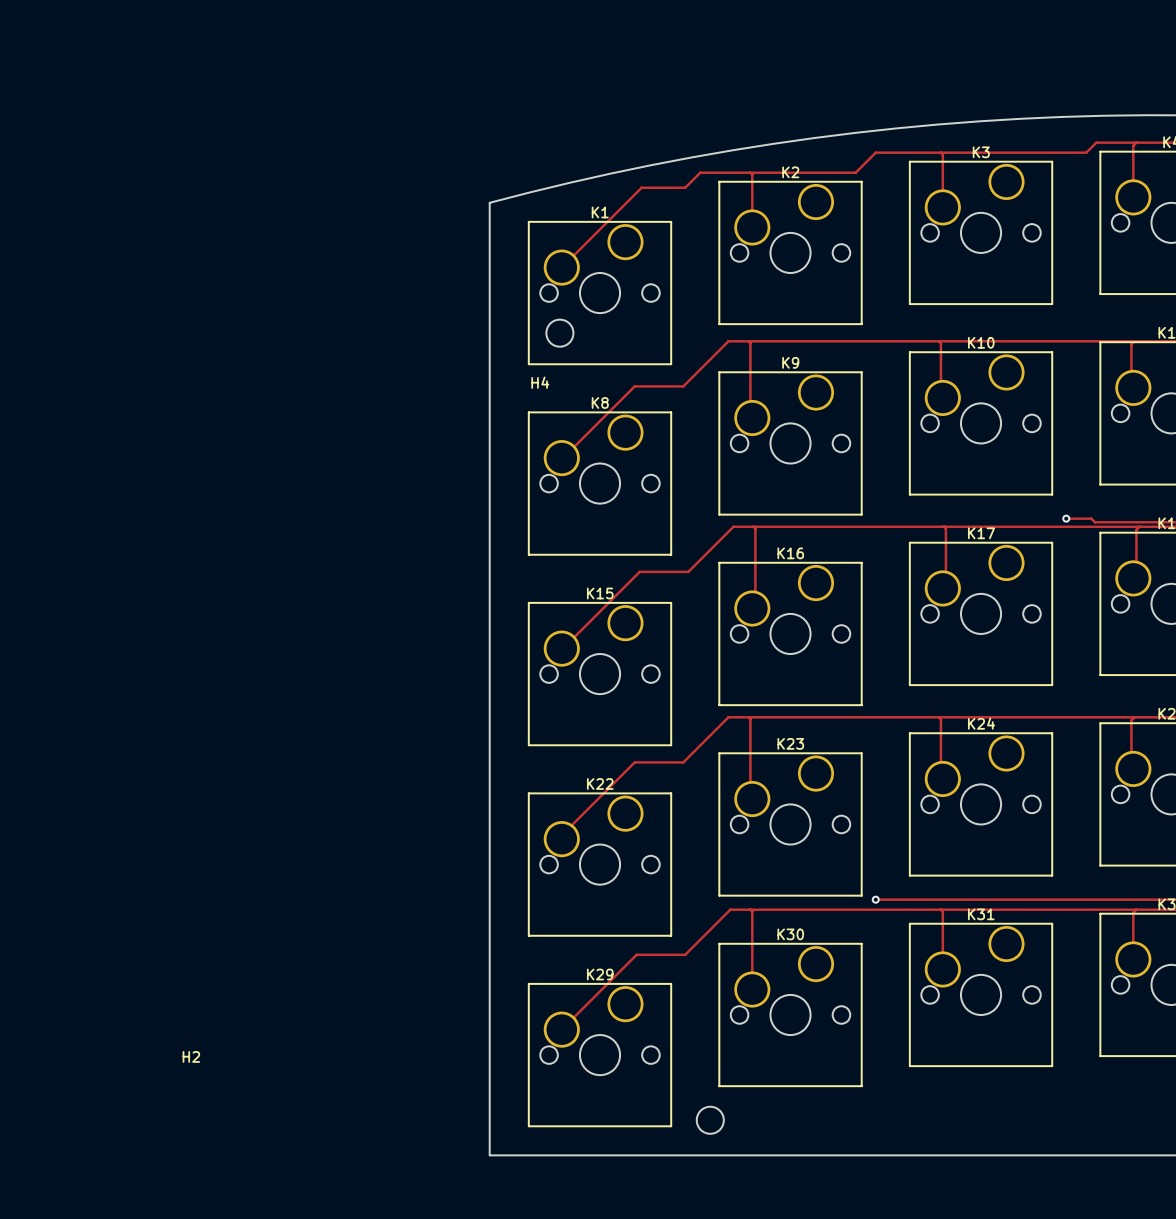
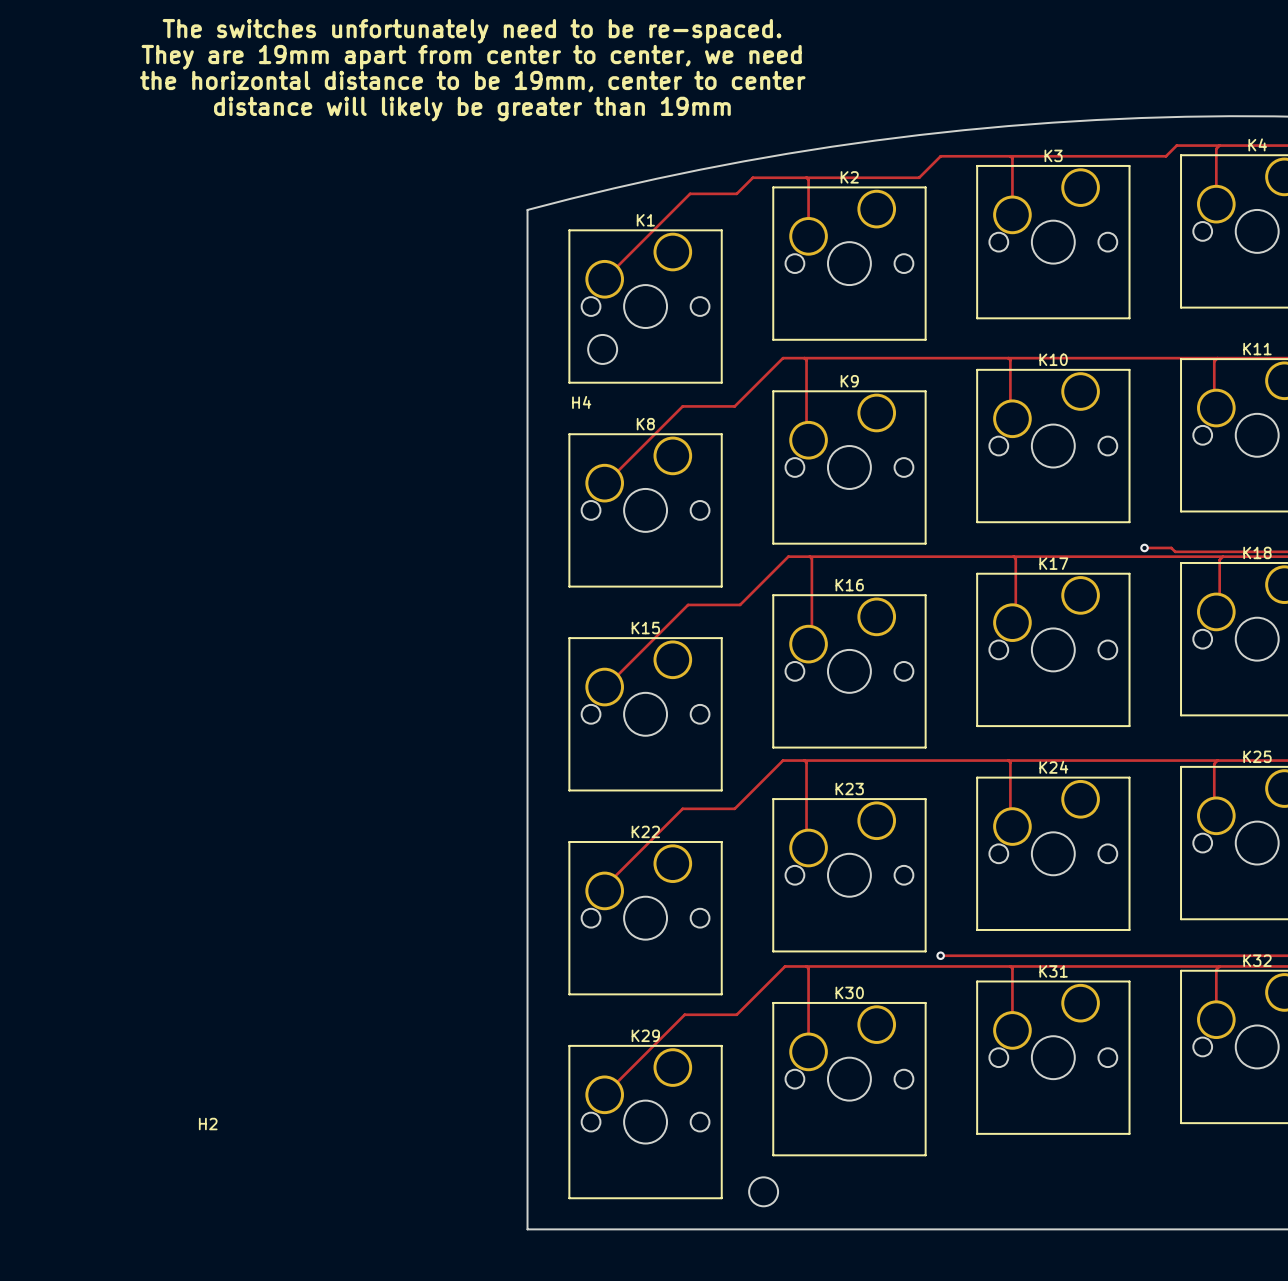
text: none -> The switches unfortunately need to be re-spaced. (472, 31)
text: none -> They are 19mm apart from center to center, we need (471, 57)
text: none -> the horizontal distance to be 19mm, center to center (472, 81)
text: none -> distance will likely be greater than 19mm (472, 109)

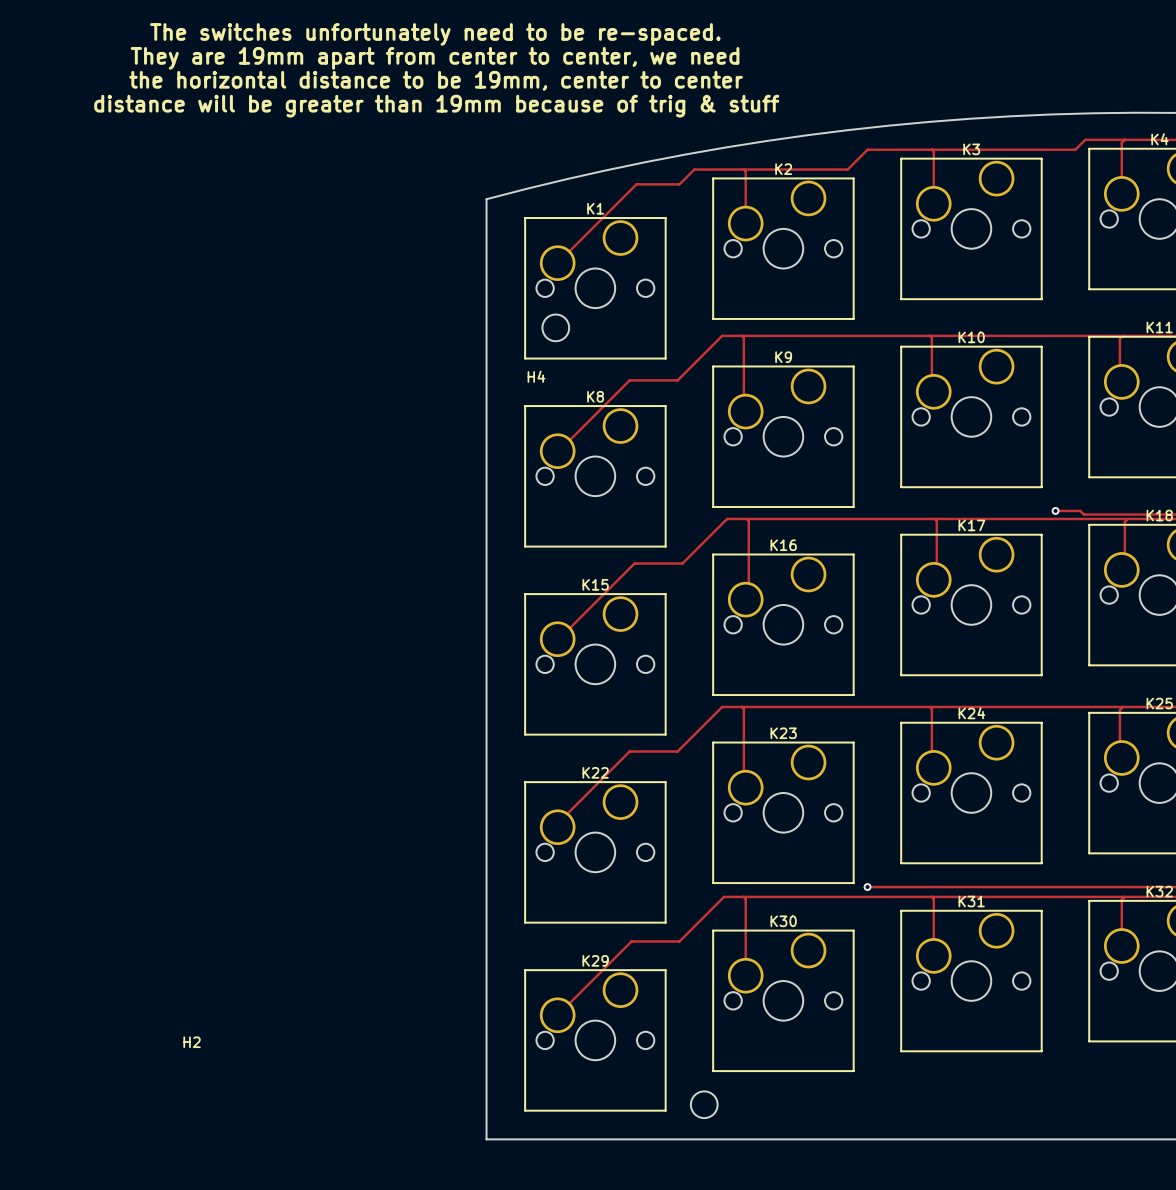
text: distance will likely be greater than 19mm (472, 109) -> distance will be greater than 19mm because of trig & stuff (436, 106)

